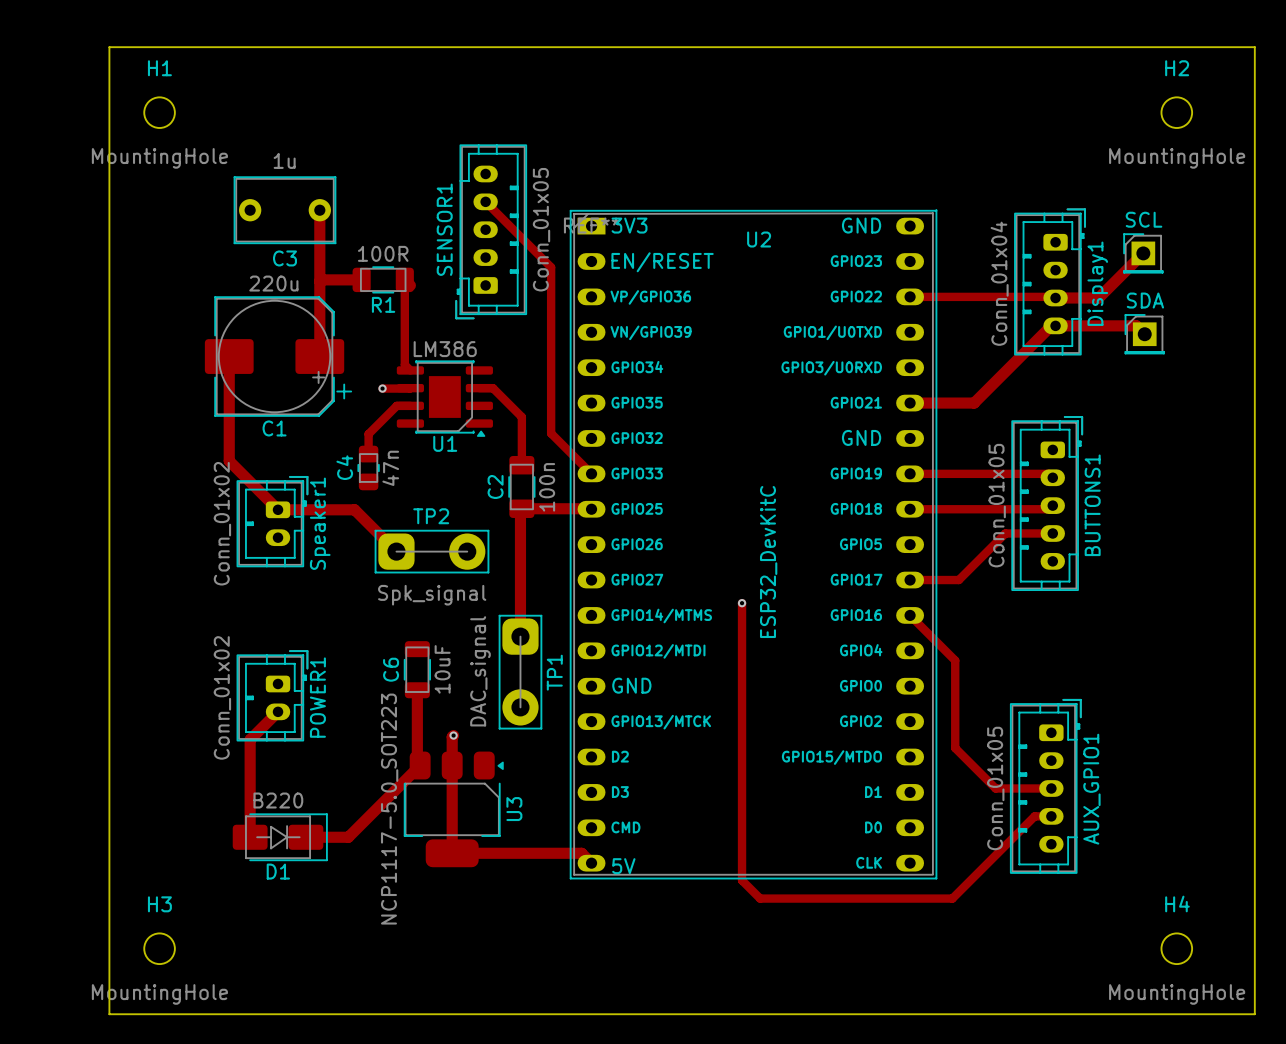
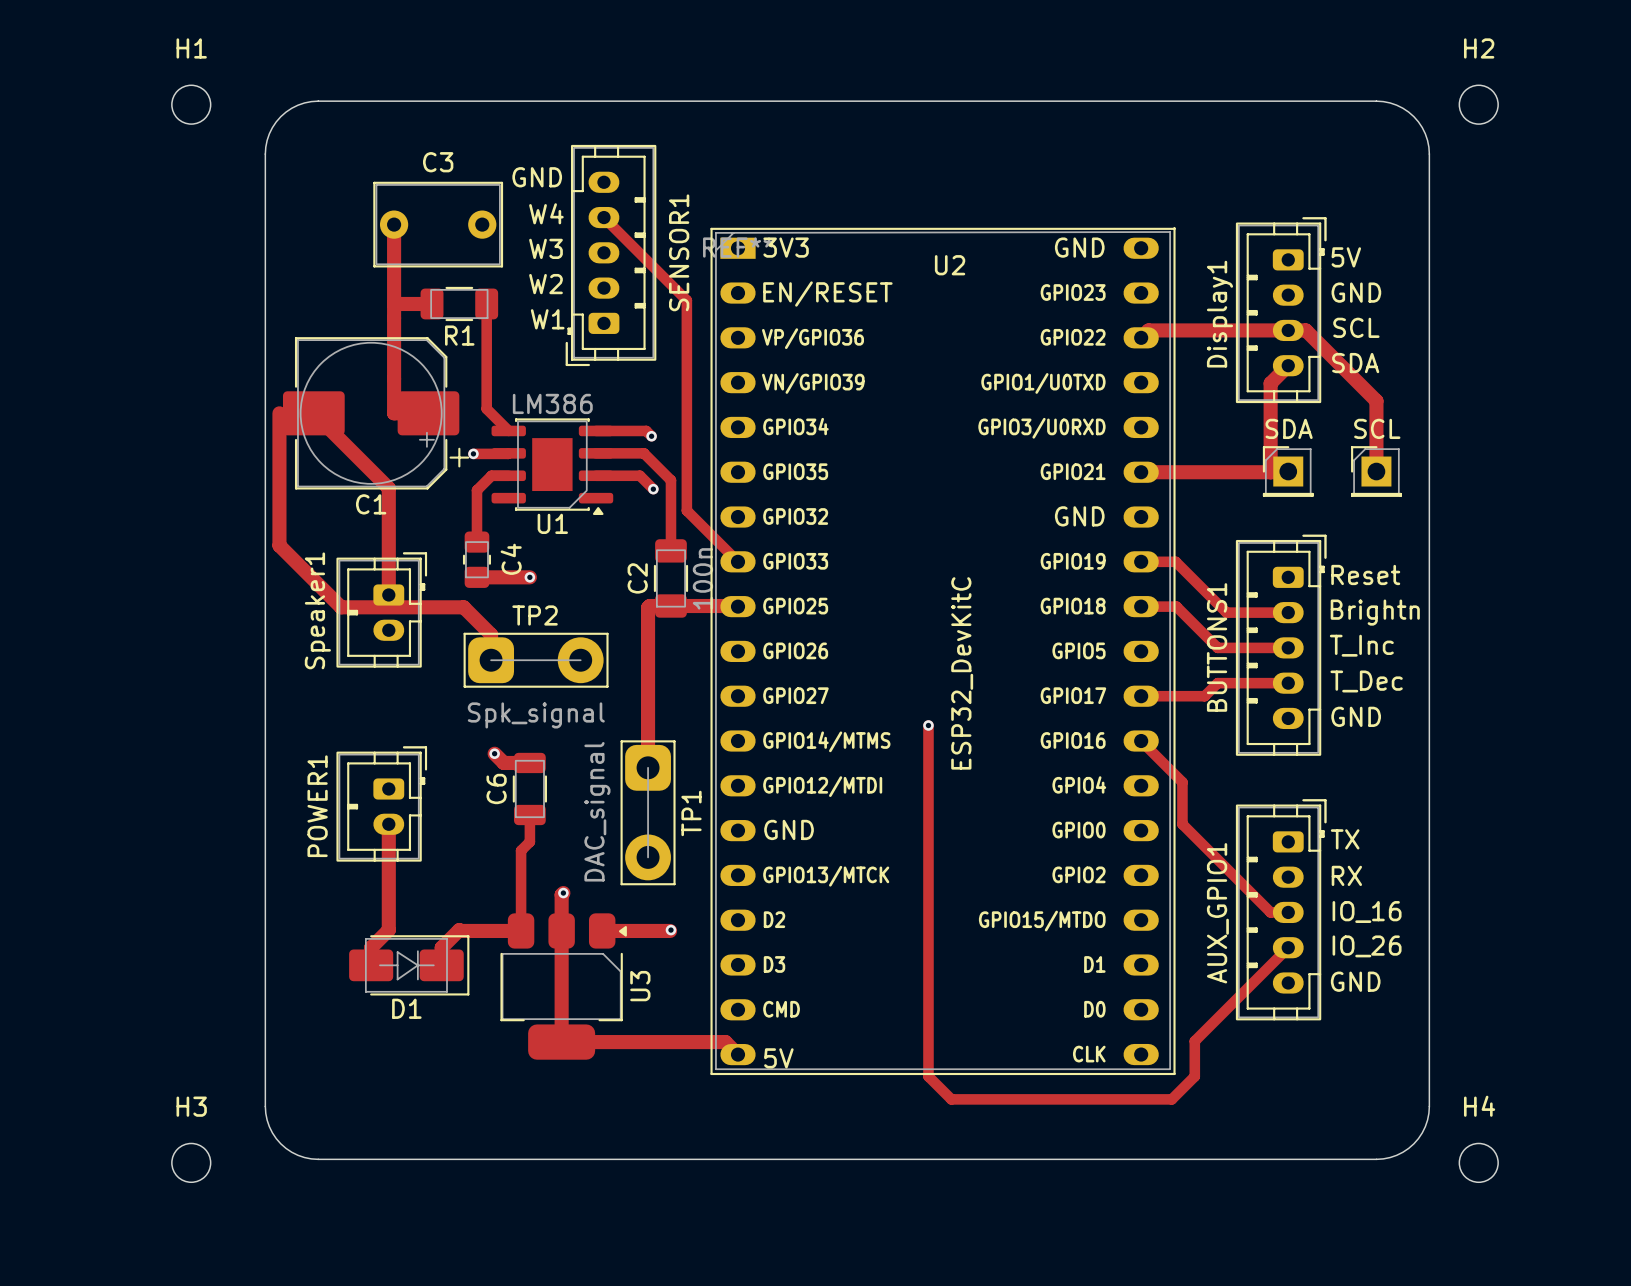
board edge: (109, 47) (1254, 47) (1254, 1014) (109, 1014) (109, 47) -> (318, 101) (298, 105) (280, 116) (269, 133) (265, 154) (265, 1106) (269, 1126) (280, 1143) (298, 1155) (318, 1159) (1376, 1159) (1396, 1155) (1413, 1143) (1425, 1126) (1429, 1106) (1429, 154) (1425, 133) (1413, 116) (1396, 105) (1376, 101) (318, 101)
H1 value: MountingHole (159, 158) -> none
H2 value: MountingHole (1177, 158) -> none
C3 value: 1u (284, 160) -> none
text: none -> GND (537, 177)
text: none -> W4 (546, 213)
U2 footprint: [569, 209, 938, 880] -> [710, 226, 1176, 1076]
C3 position: (284, 210) -> (438, 224)
text: none -> W3 (545, 248)
SENSOR1 name position: SENSOR1 (444, 229) -> SENSOR1 (679, 252)
SENSOR1 value: Conn_01x05 (541, 229) -> none
text: none -> 5V (1346, 257)
R1 value: 100R (383, 253) -> none
track: (1143, 253) (1098, 298) (910, 296) -> (1376, 471) (1376, 400) (1305, 330) (1148, 330) (1141, 337)
SCL position: (1143, 253) -> (1376, 471)
text: none -> W2 (545, 284)
C3 name position: C3 (284, 258) -> C3 (438, 162)
text: none -> GND (1356, 292)
track: none -> (394, 303) (432, 303)
track: (361, 279) (319, 281) -> none
R1 position: (383, 279) -> (459, 303)
Display1 position: (1049, 281) -> (1281, 310)
text: none -> W1 (547, 319)
C1 value: 220u (273, 283) -> none
Display1 value: Conn_01x04 (999, 283) -> none
Display1 name position: Display1 (1097, 283) -> Display1 (1220, 314)
track: (410, 285) (404, 279) (404, 364) -> (486, 303) (486, 408) (501, 423)
text: none -> SCL (1356, 327)
text: none -> SDA (1355, 363)
track: none -> (1288, 365) (1270, 383) (1270, 472)
track: (1144, 334) (1136, 325) (1051, 325) (974, 403) -> (1288, 471) (1222, 472)
SDA position: (1144, 334) -> (1288, 471)
track: none -> (313, 413) (388, 488) (388, 594)
C1 position: (278, 356) -> (376, 413)
track: none -> (596, 430) (646, 430) (651, 436)
via: none -> (651, 436)
track: (492, 388) (521, 417) (521, 465) -> (613, 453) (644, 453) (670, 480) (670, 550)
track: none -> (596, 475) (639, 475) (653, 489)
via: none -> (653, 489)
track: (385, 417) (368, 434) (368, 454) -> (476, 490) (476, 542)
C4 name position: C4 (344, 467) -> C4 (511, 559)
C4 position: (368, 468) -> (476, 559)
C4 value: 47n (390, 468) -> none
track: (937, 473) (1048, 473) (1052, 477) -> (1175, 561) (1226, 612) (1288, 612)
text: none -> Reset (1365, 574)
track: none -> (476, 577) (529, 577)
via: none -> (529, 577)
C2 position: (521, 486) -> (670, 578)
BUTTONS1 position: (1047, 503) -> (1281, 645)
BUTTONS1 value: Conn_01x05 (997, 505) -> none
track: (1052, 505) (1049, 509) (937, 509) -> (1288, 647) (1217, 647) (1176, 606)
BUTTONS1 name position: BUTTONS1 (1092, 505) -> BUTTONS1 (1217, 647)
track: (354, 509) (396, 551) -> (438, 607) (463, 607) (491, 634) (491, 660)
text: none -> Brightn (1375, 612)
Speaker1 position: (272, 521) -> (381, 609)
Speaker1 value: Conn_01x02 (222, 523) -> none
Speaker1 name position: Speaker1 (320, 523) -> Speaker1 (317, 610)
track: (1052, 533) (1005, 533) (958, 580) -> (1288, 683) (1217, 683) (1202, 696)
text: none -> T_Inc (1361, 645)
text: none -> T_Dec (1366, 681)
text: none -> GND (1356, 716)
track: none -> (494, 753) (503, 762) (529, 762)
via: none -> (494, 753)
track: (942, 648) (955, 660) (955, 748) (995, 788) (1051, 788) -> (1182, 782) (1182, 824) (1270, 912) (1288, 912)
C6 position: (417, 669) -> (529, 788)
C6 value: 10uF (442, 669) -> none
track: none -> (529, 815) (529, 841) (521, 850) (521, 930) (459, 930) (441, 947) (441, 965)
track: none -> (388, 824) (388, 930) (371, 947) (371, 965)
track: (417, 690) (417, 762) -> none
text: none -> TX (1345, 839)
POWER1 position: (272, 695) -> (381, 803)
POWER1 value: Conn_01x02 (222, 697) -> none
POWER1 name position: POWER1 (317, 697) -> POWER1 (317, 806)
track: (278, 711) (250, 739) (250, 837) -> none
text: none -> RX (1346, 875)
text: none -> IO_16 (1367, 912)
track: none -> (670, 930) (602, 930)
via: none -> (670, 930)
track: (420, 765) (348, 837) (305, 837) -> none
text: none -> IO_26 (1367, 946)
AUX_GPIO1 position: (1045, 786) -> (1281, 909)
AUX_GPIO1 value: Conn_01x05 (995, 788) -> none
AUX_GPIO1 name position: AUX_GPIO1 (1091, 789) -> AUX_GPIO1 (1217, 913)
D1 value: B220 (278, 800) -> none
text: none -> GND (1355, 981)
U3 value: NCP1117-5.0_SOT223 (389, 809) -> none
track: (1051, 816) (1034, 816) (952, 898) (934, 898) -> (1288, 947) (1194, 1041) (1194, 1076) (1171, 1099)
D1 position: (280, 837) -> (409, 965)
H3 value: MountingHole (159, 994) -> none
H4 value: MountingHole (1177, 994) -> none

